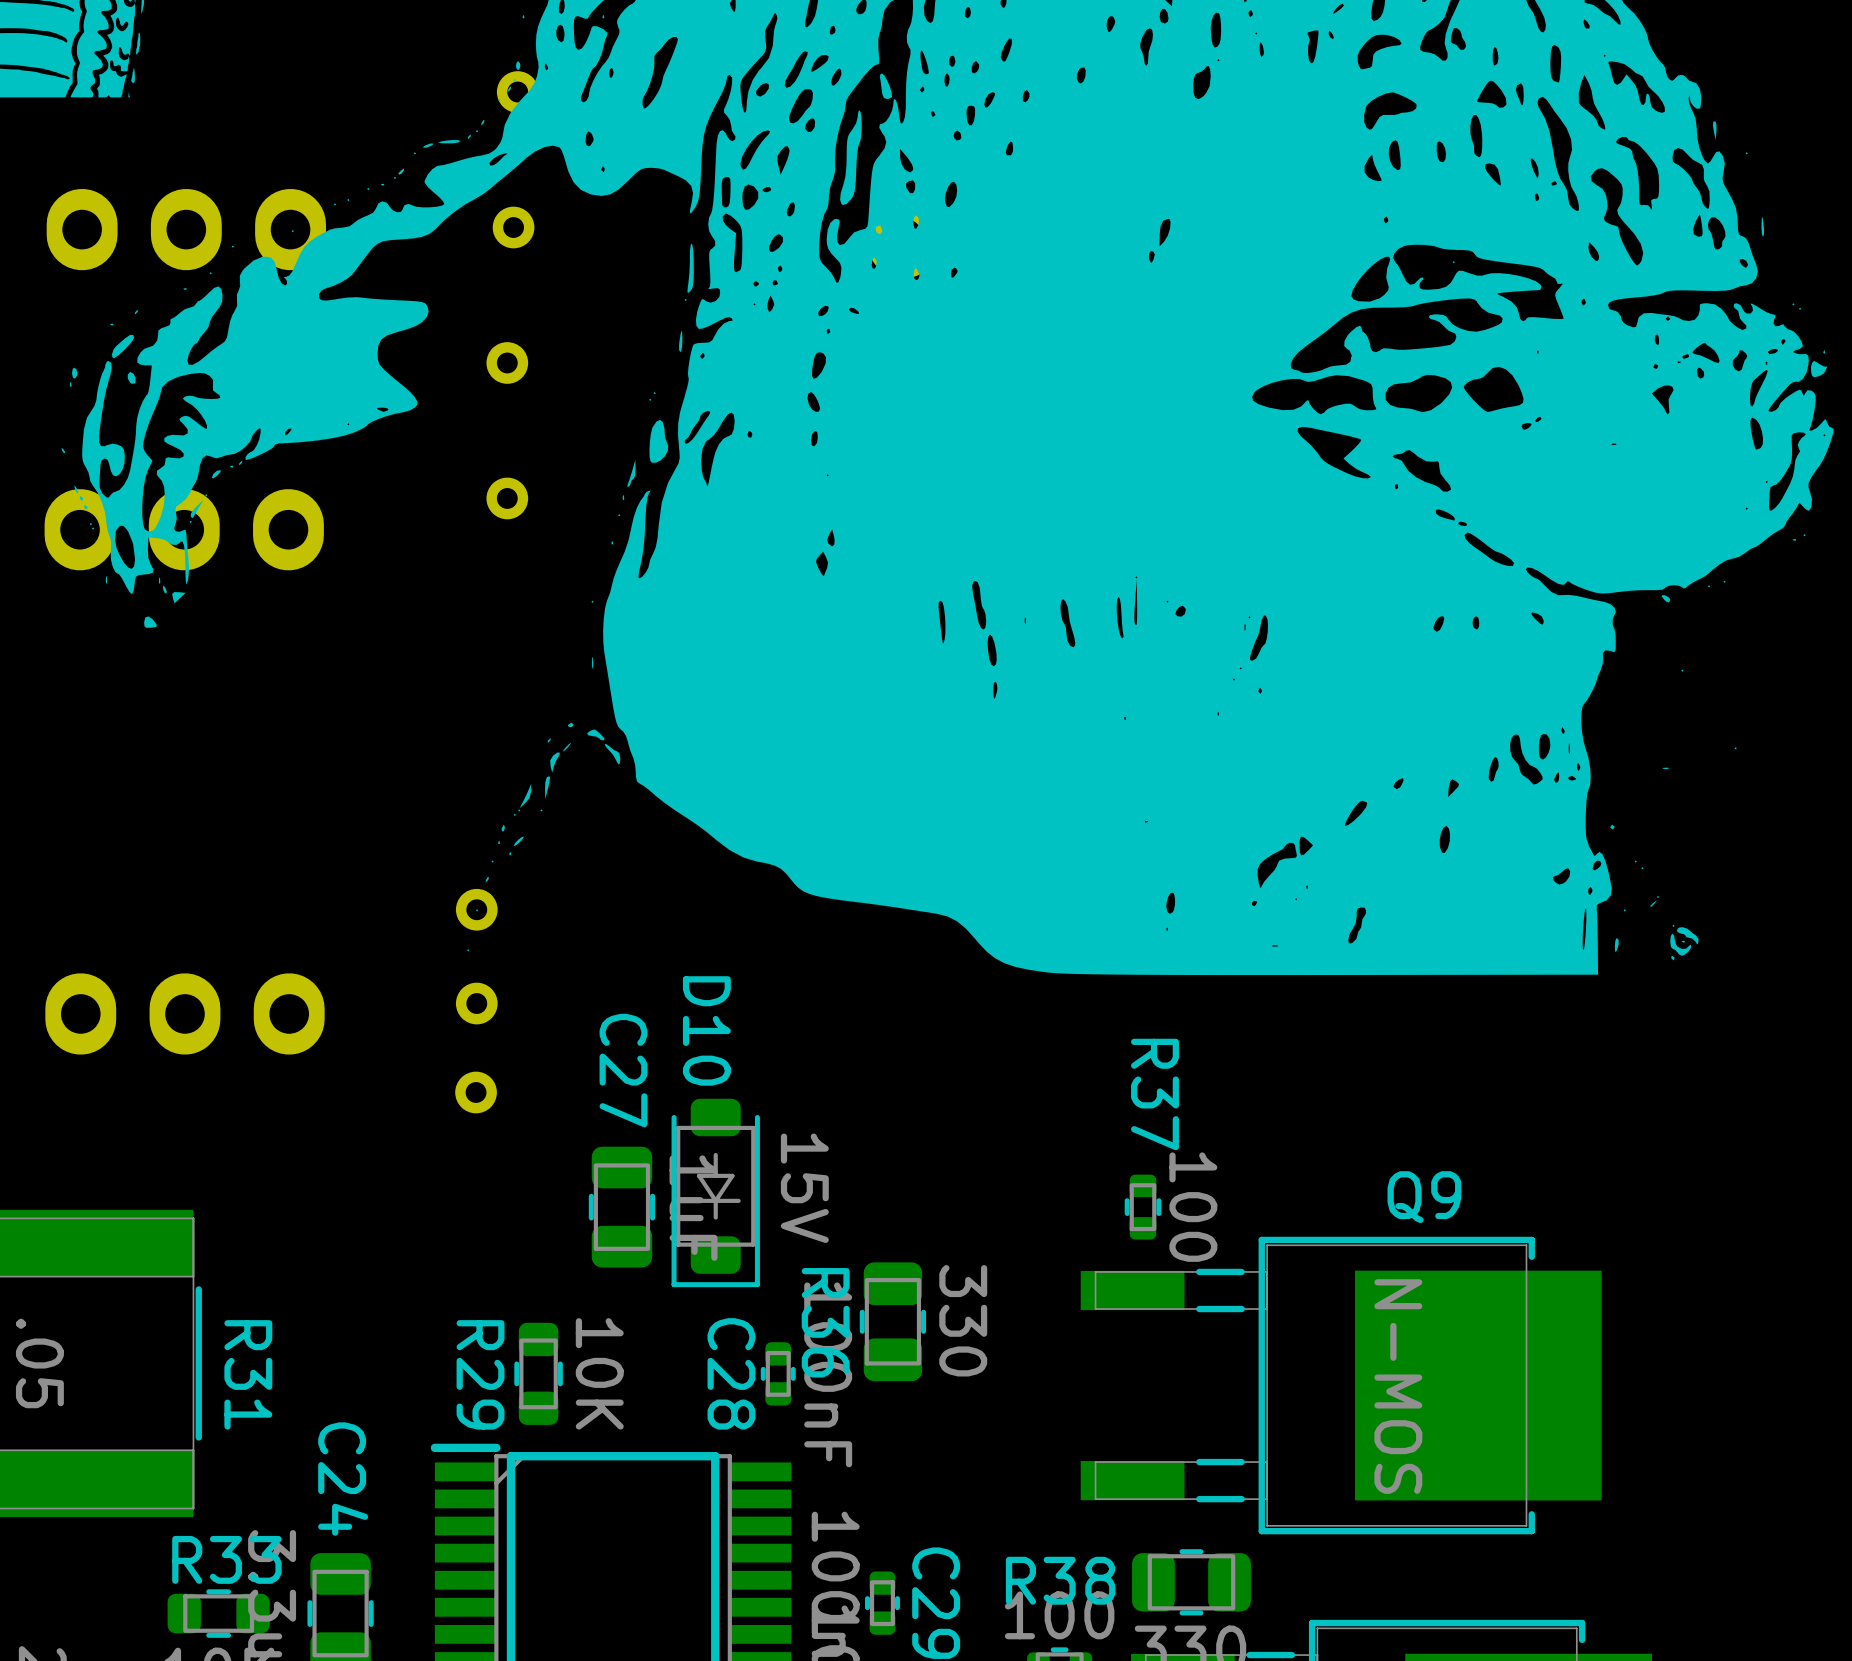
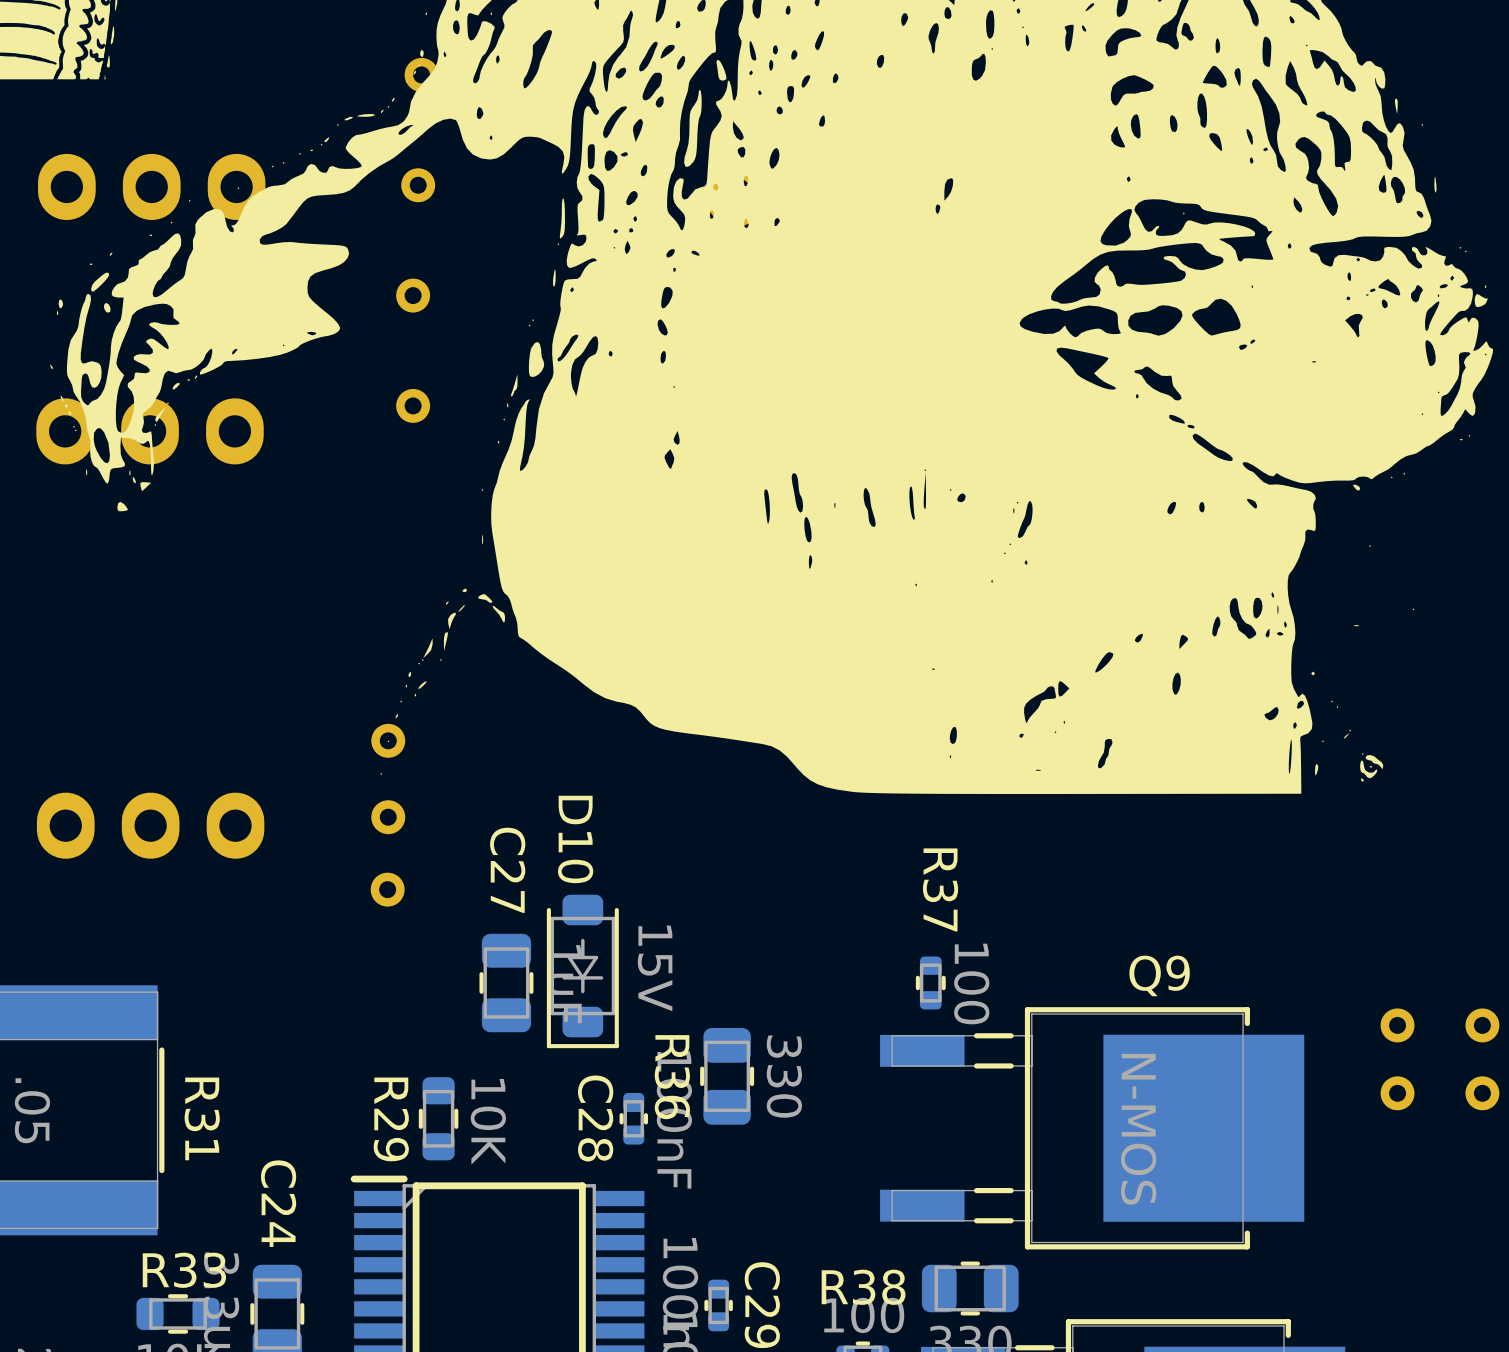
part: none -> (1397, 1025)
part: none -> (1482, 1025)
part: none -> (1397, 1093)
part: none -> (1482, 1093)

